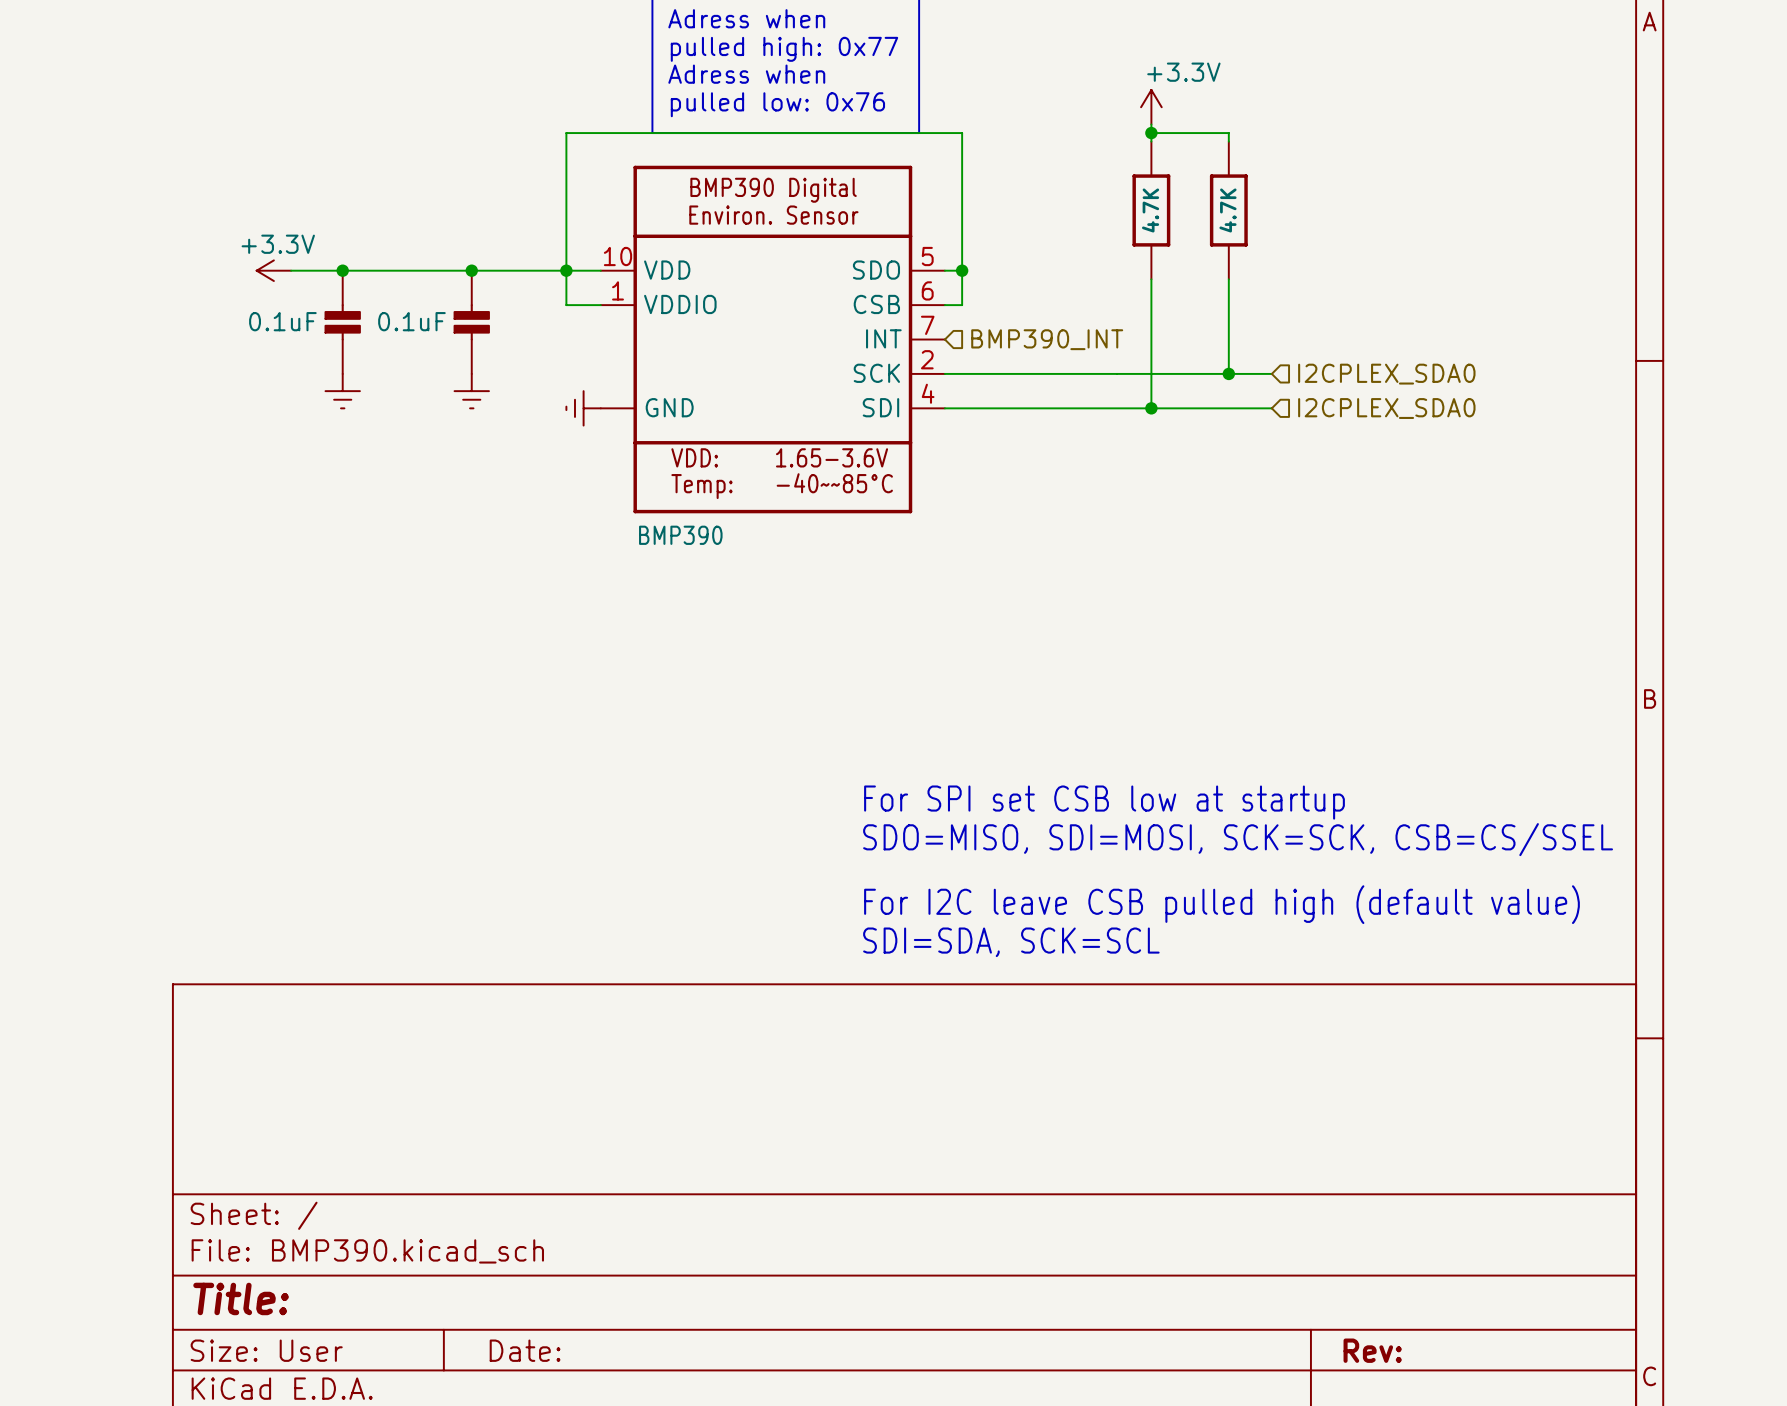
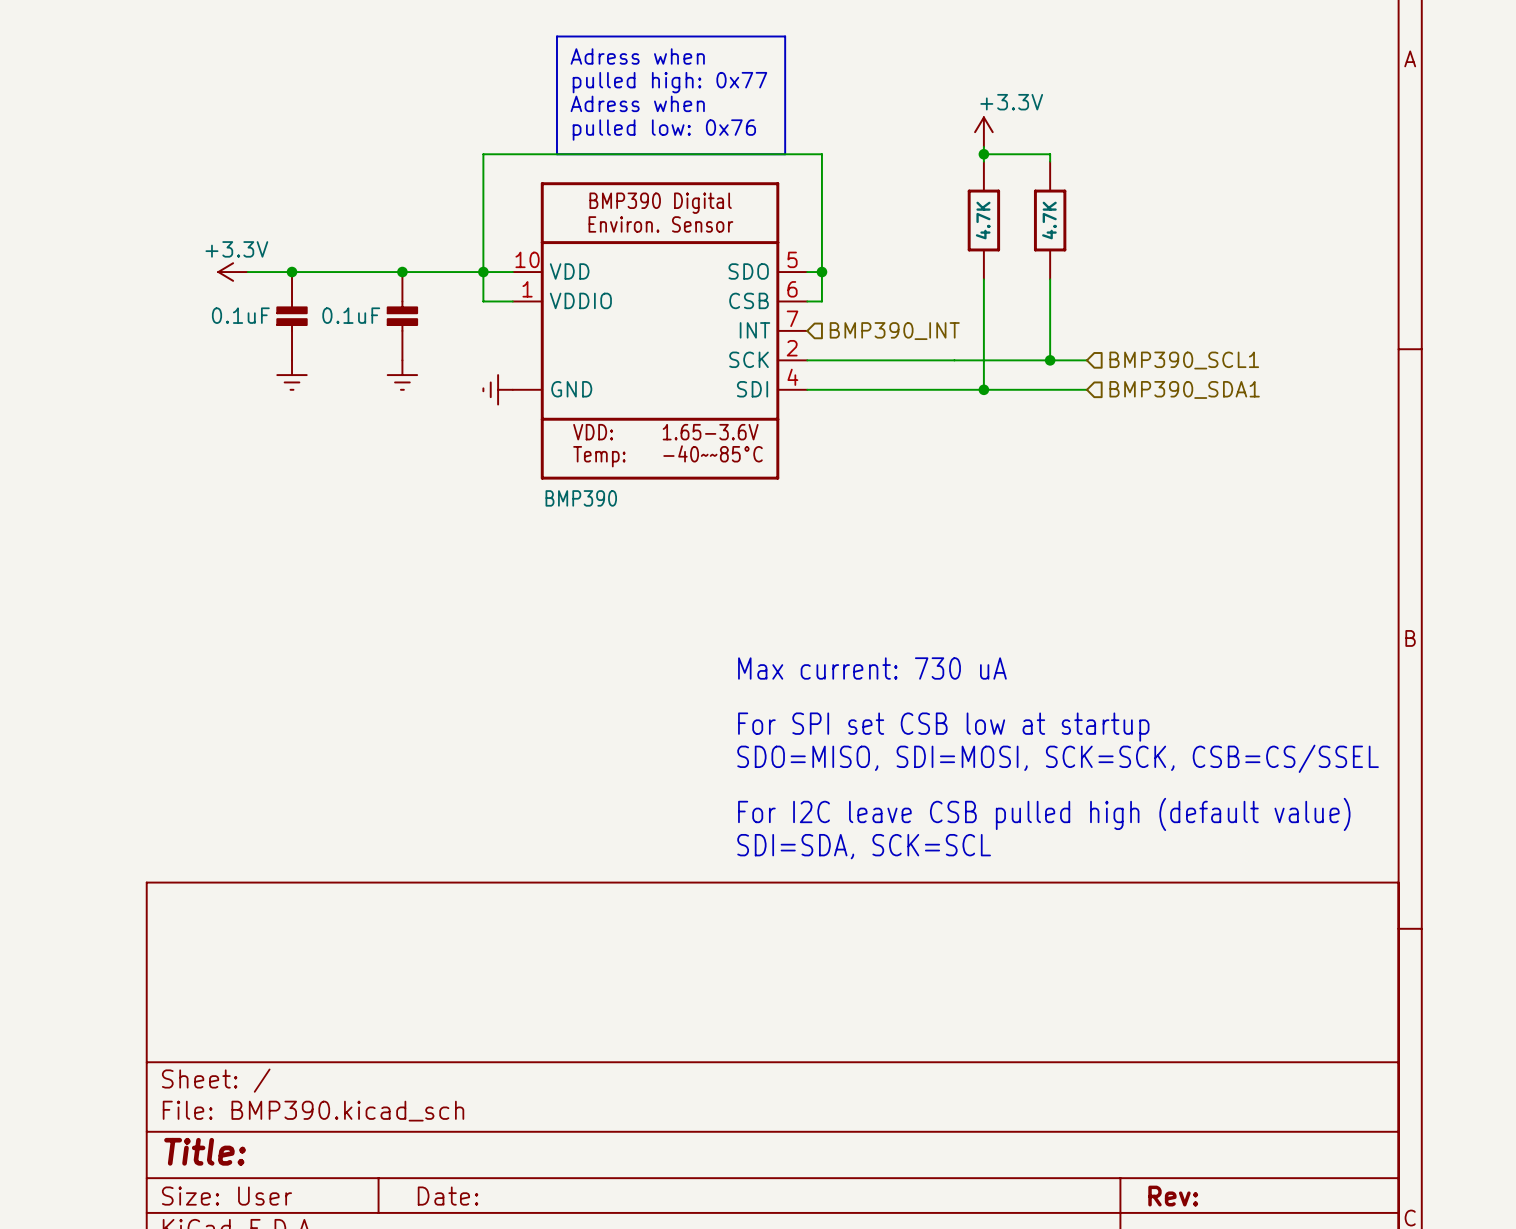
hierarchical label: I2CPLEX_SDA0 (1386, 374) -> BMP390_SCL1 (1184, 360)
hierarchical label: I2CPLEX_SDA0 (1386, 408) -> BMP390_SDA1 (1184, 389)
text: none -> Max current: 730 uA (872, 668)

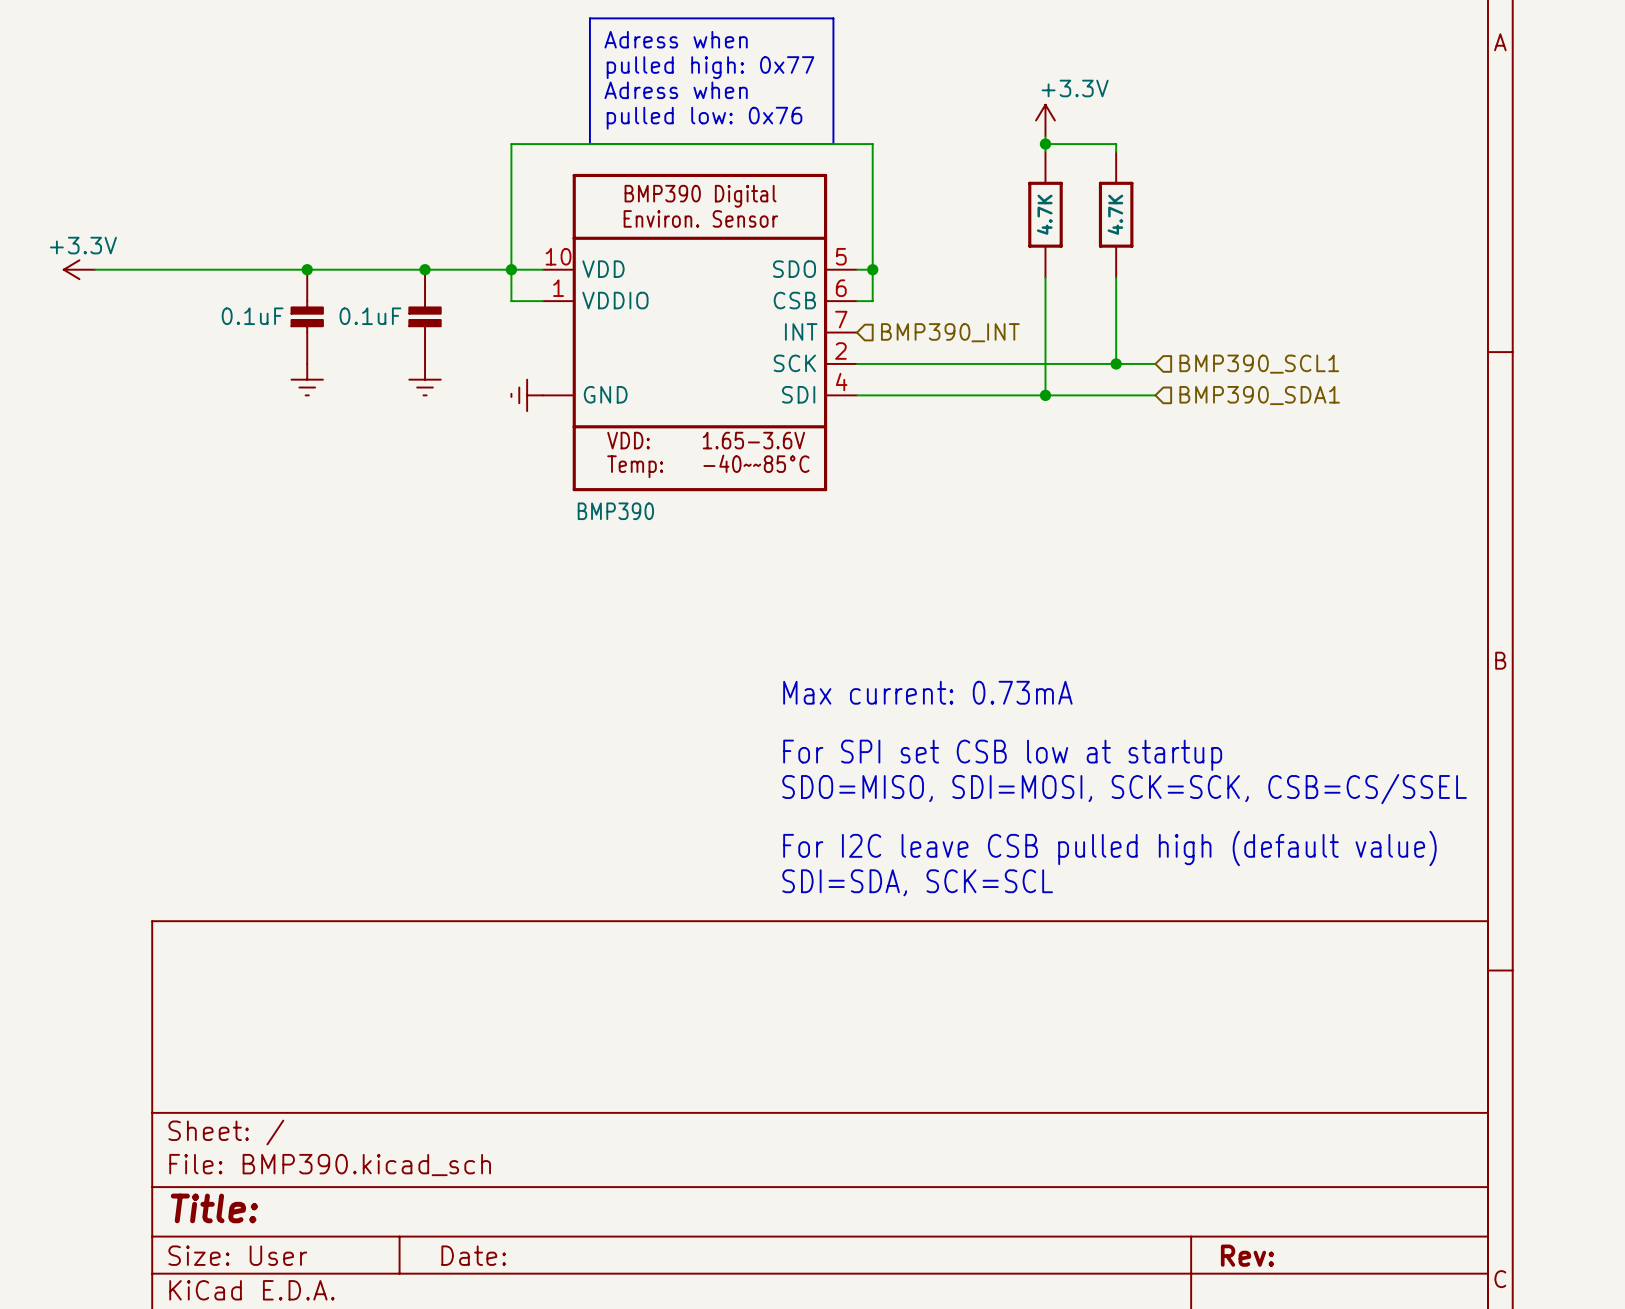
wire: none -> (95, 269) (260, 269)
power symbol position: +3.3V (233, 272) -> +3.3V (79, 269)
text: Max current: 730 uA (872, 668) -> Max current: 0.73mA (927, 692)

